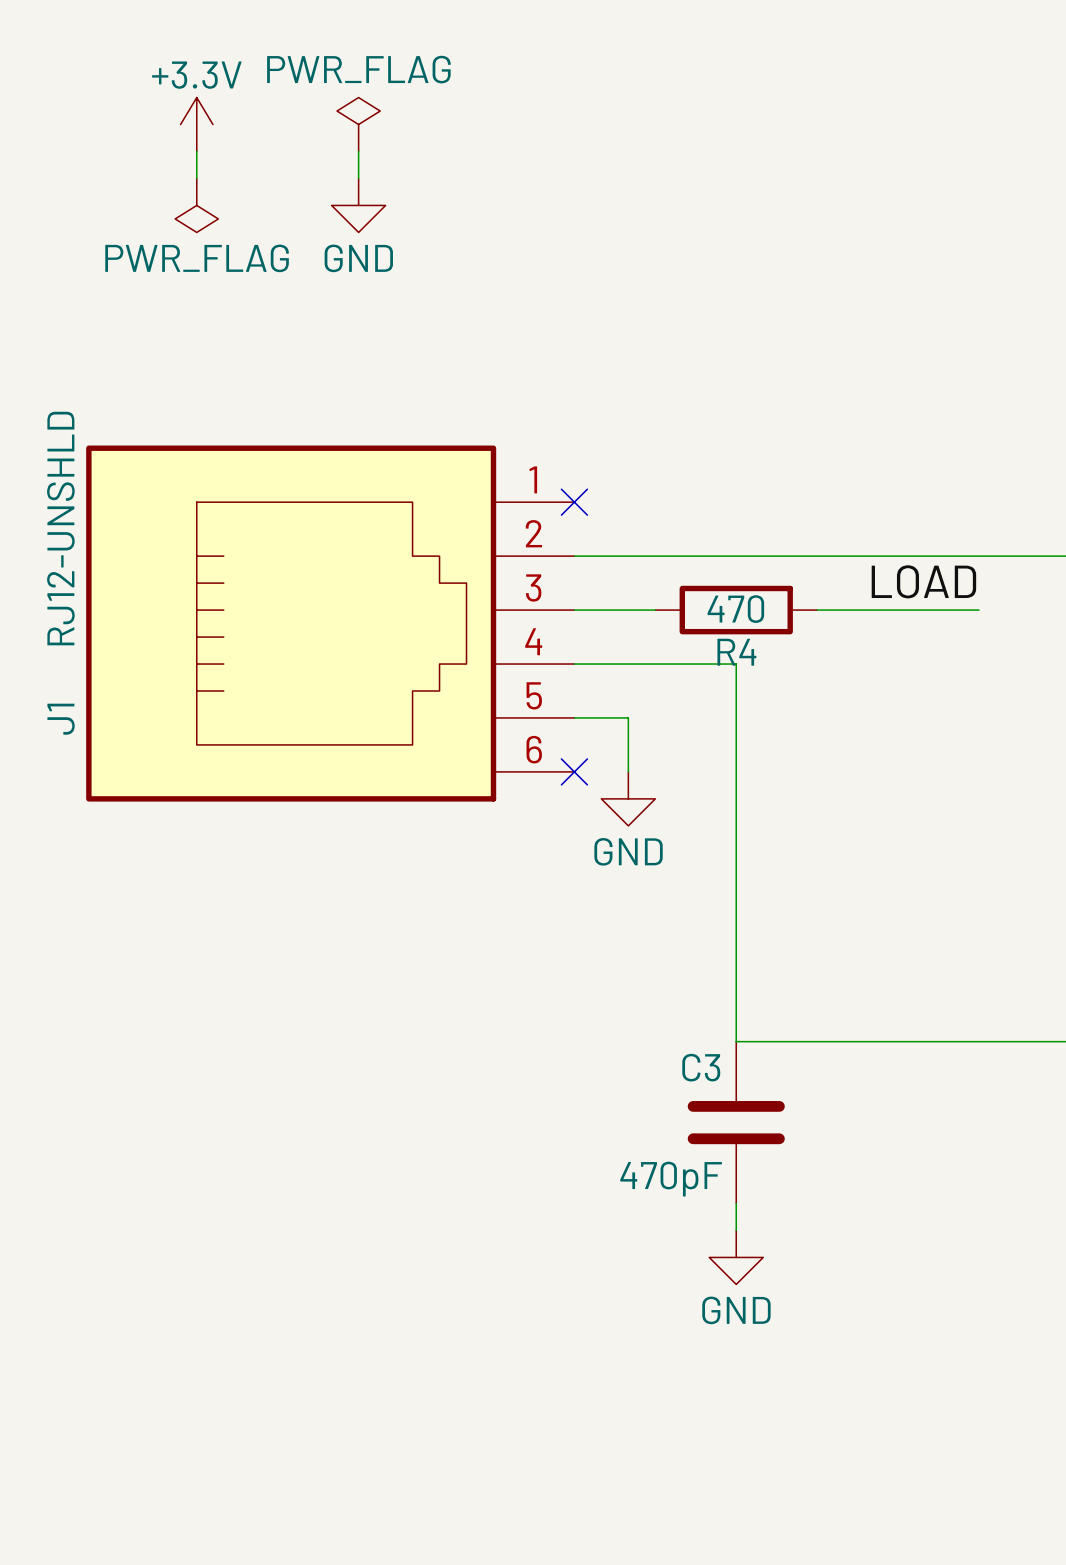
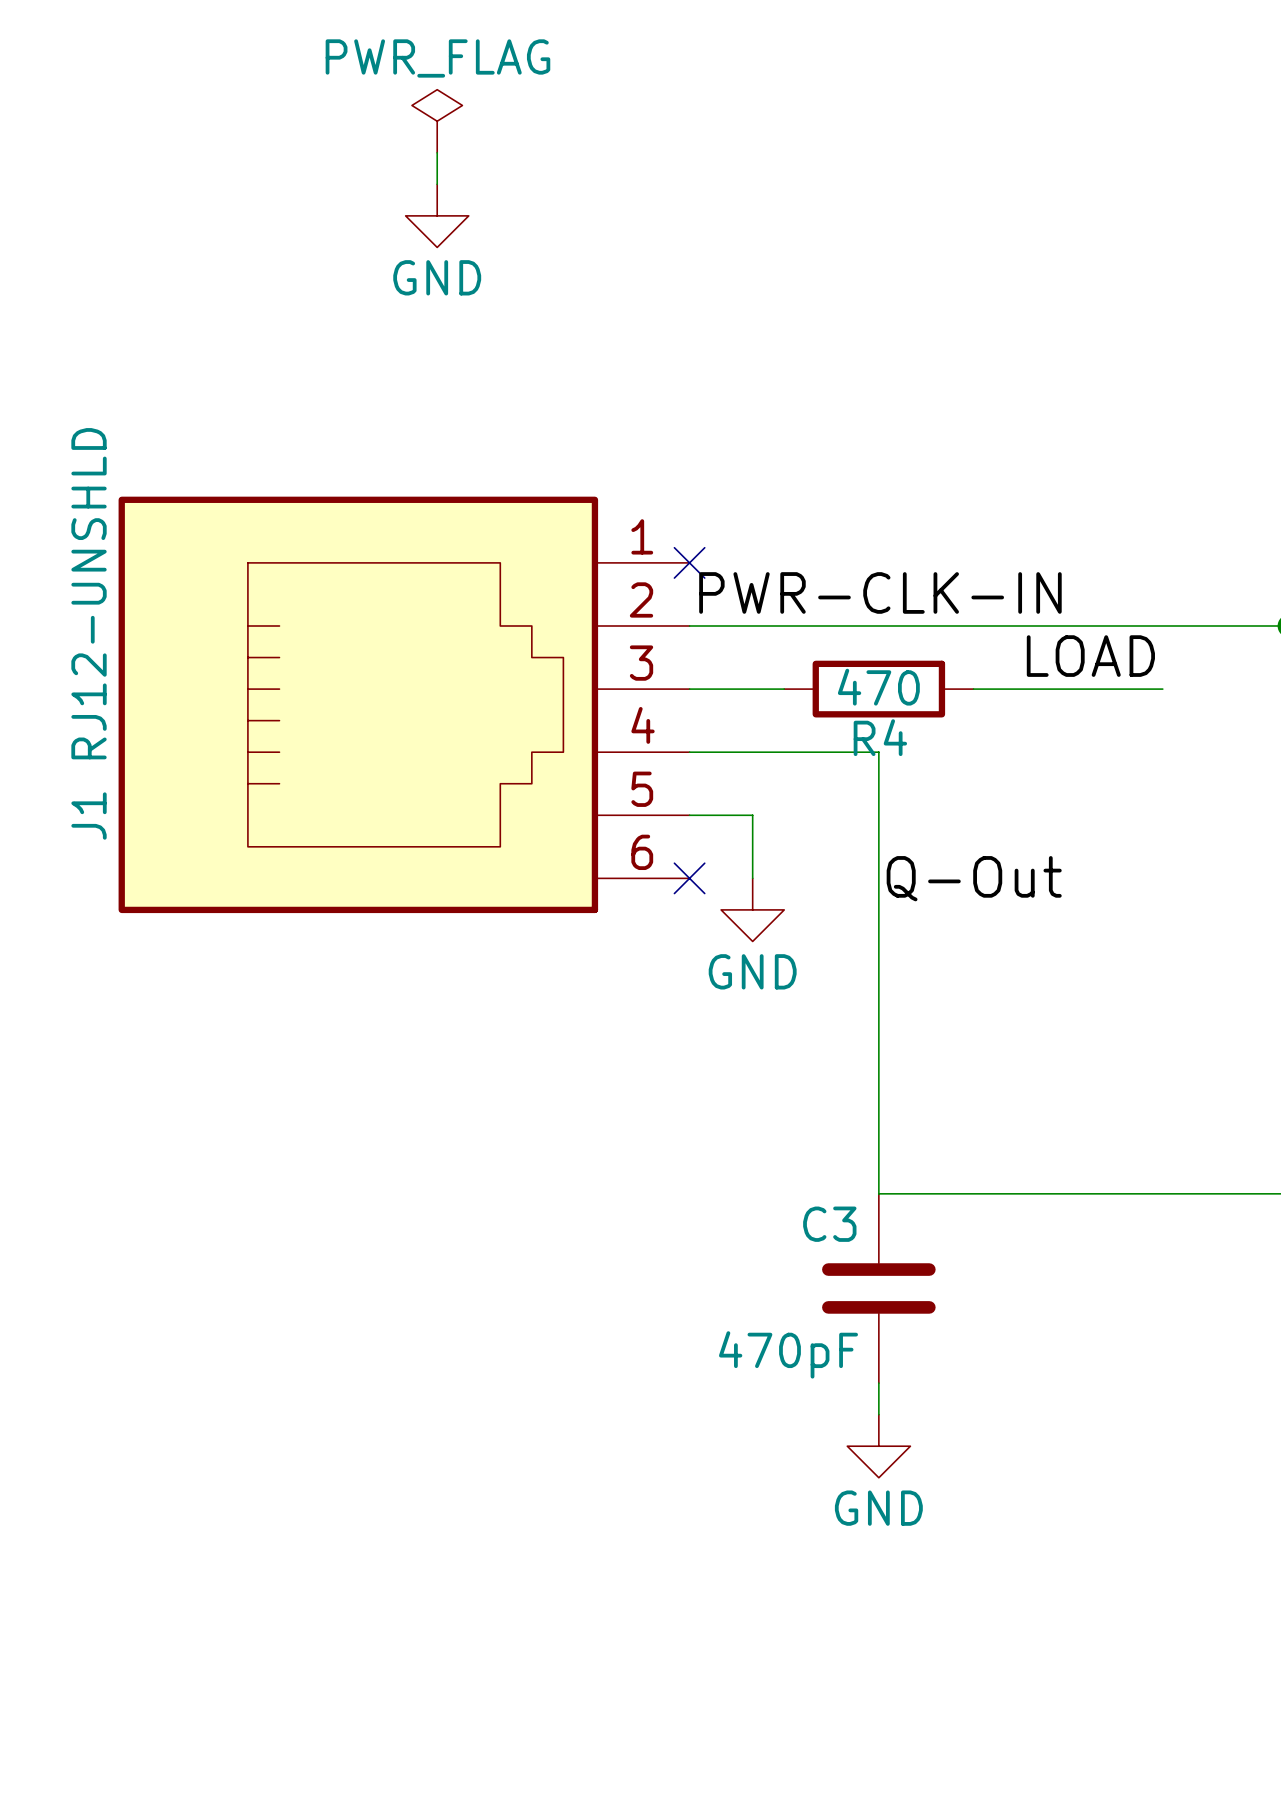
power symbol: +3.3V (196, 124) -> none
wire: (196, 151) (196, 178) -> none
power symbol: PWR_FLAG (196, 205) -> none
label: none -> PWR-CLK-IN (880, 592)
label: none -> Q-Out (974, 878)

